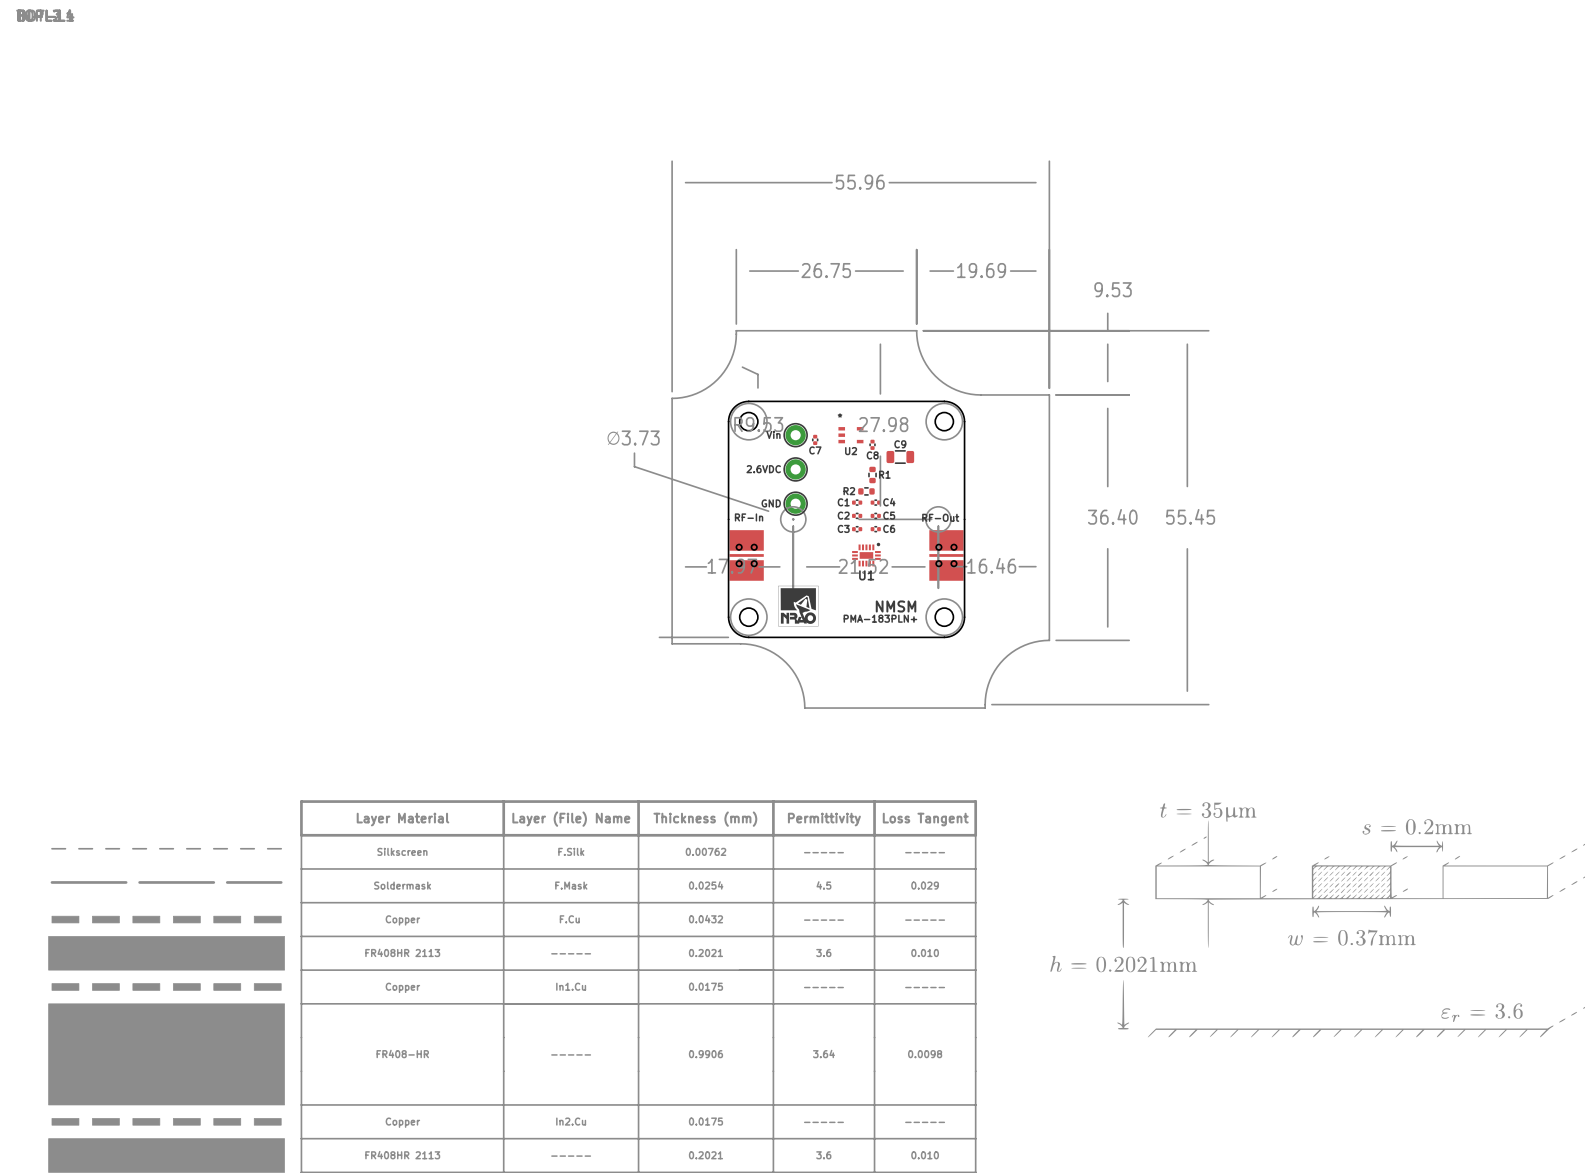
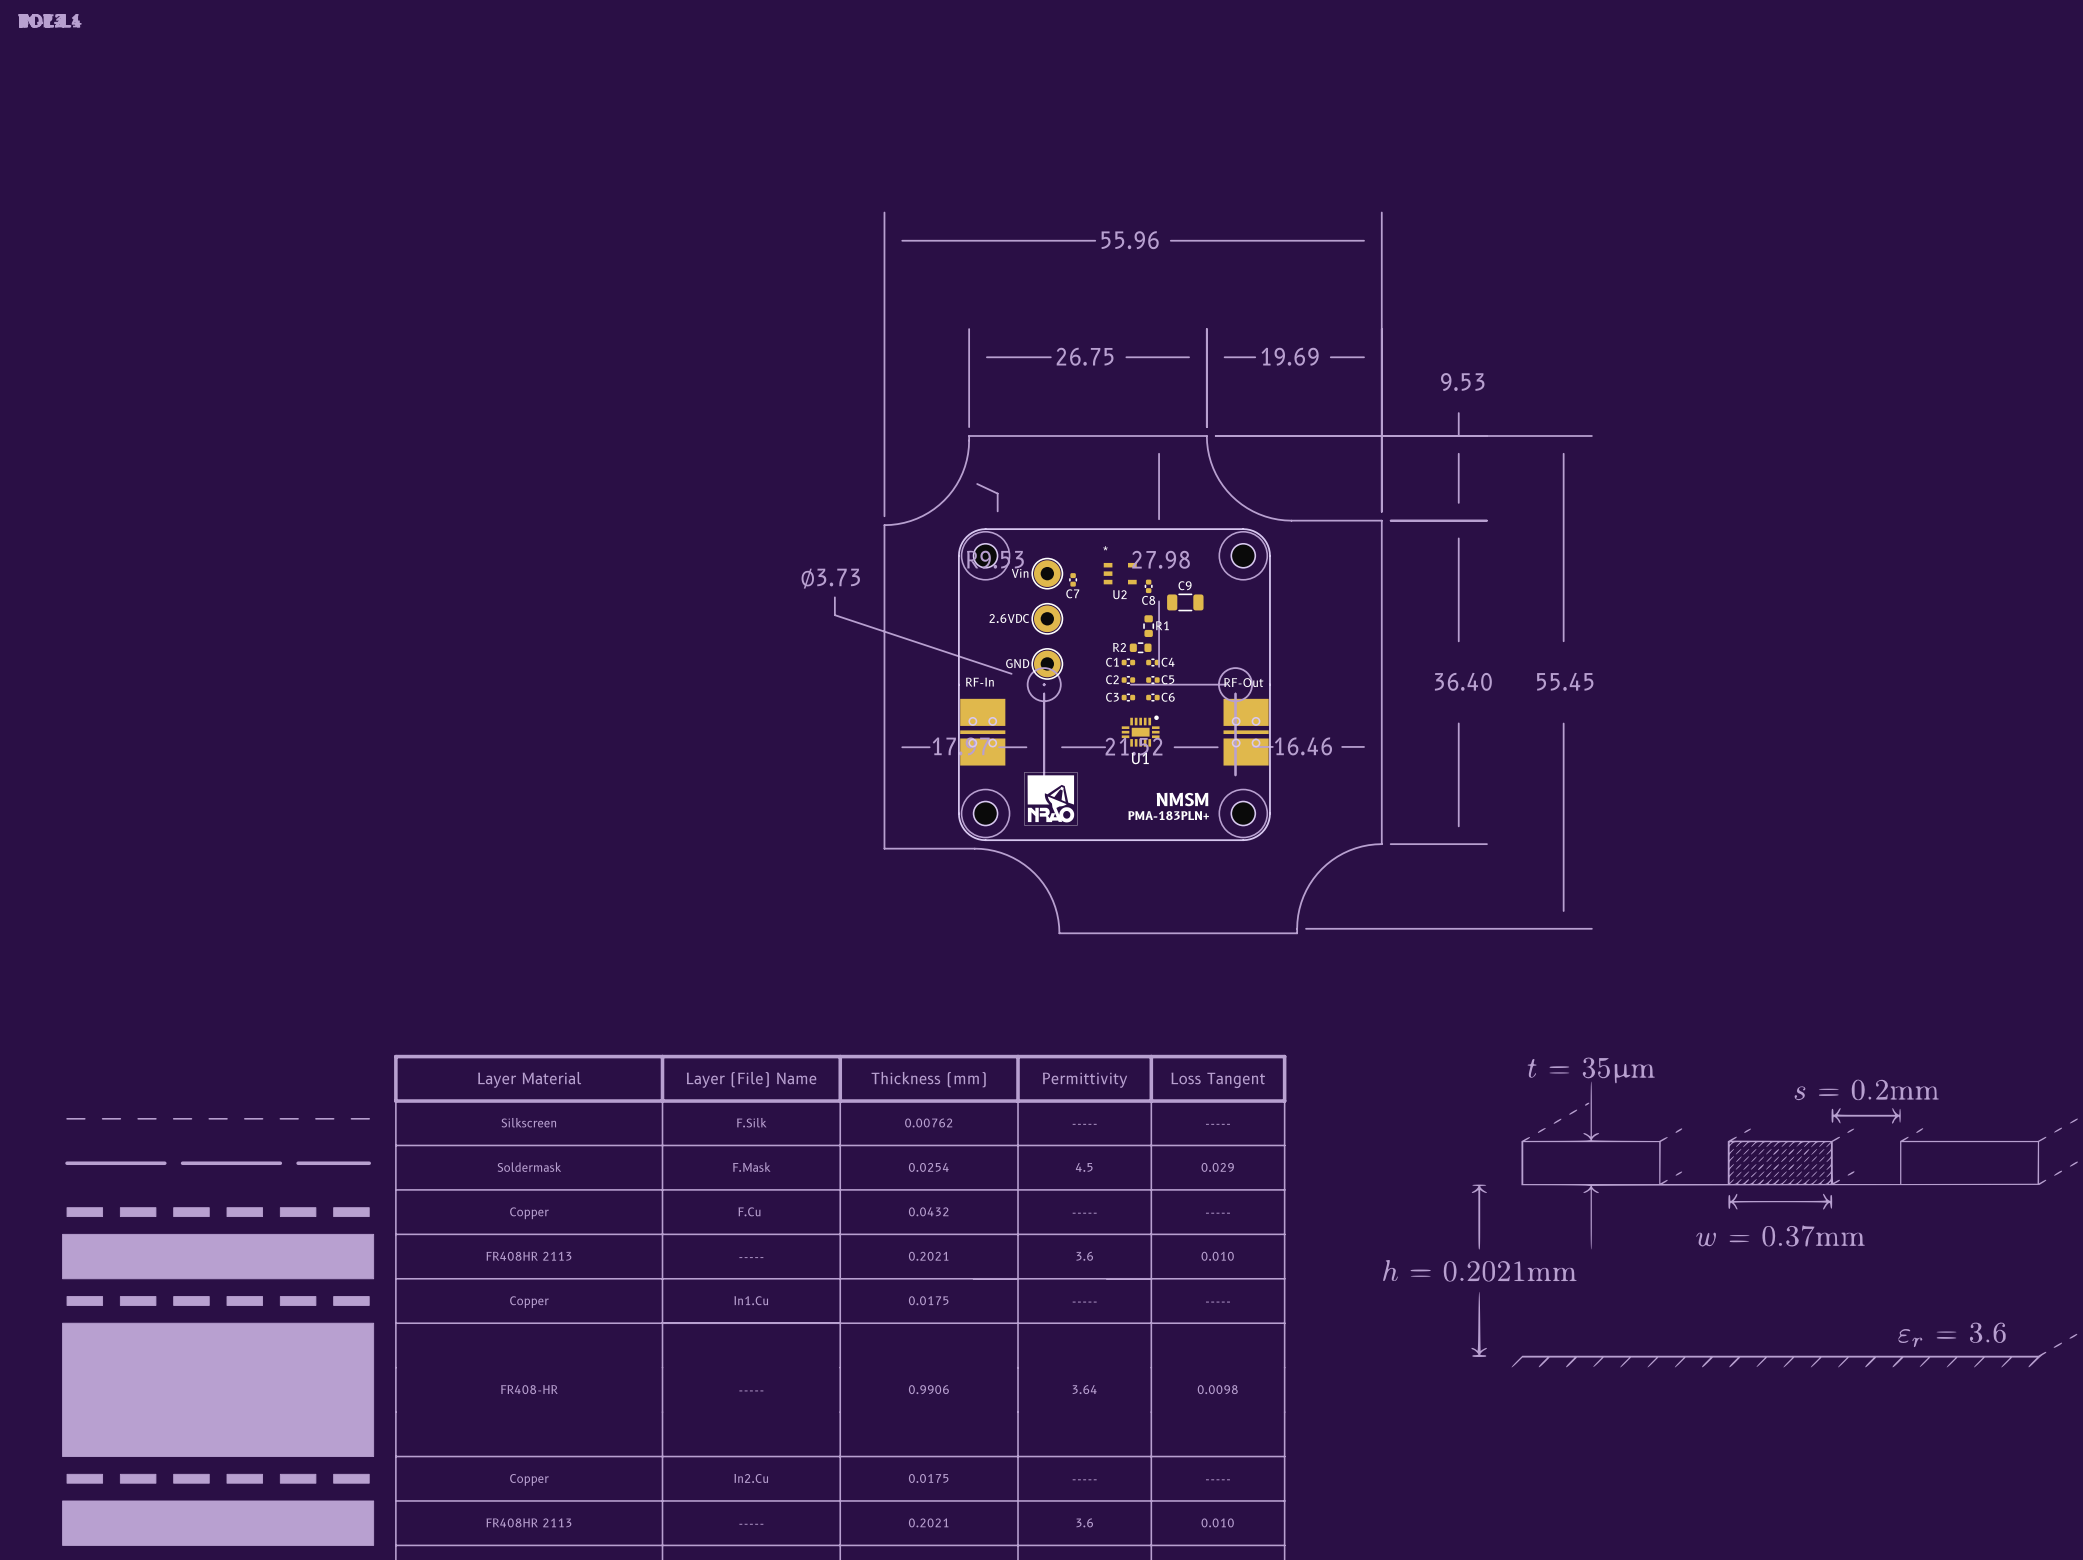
line: (659, 637) (728, 637) -> none

